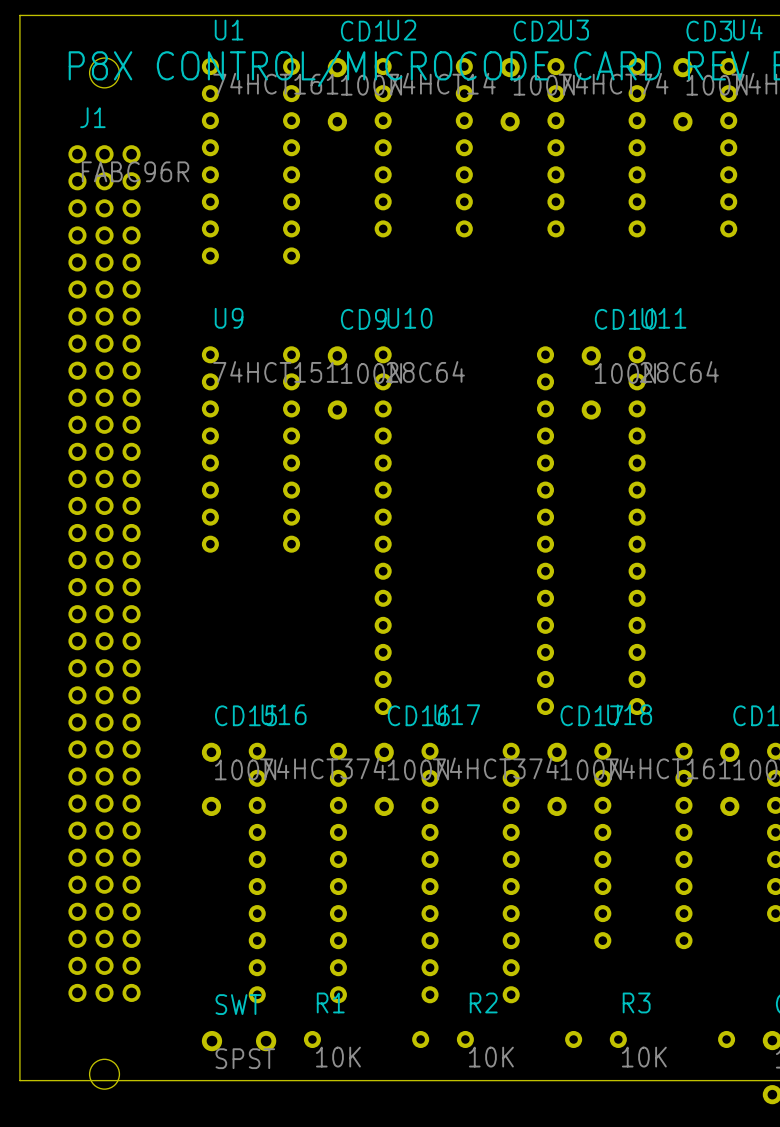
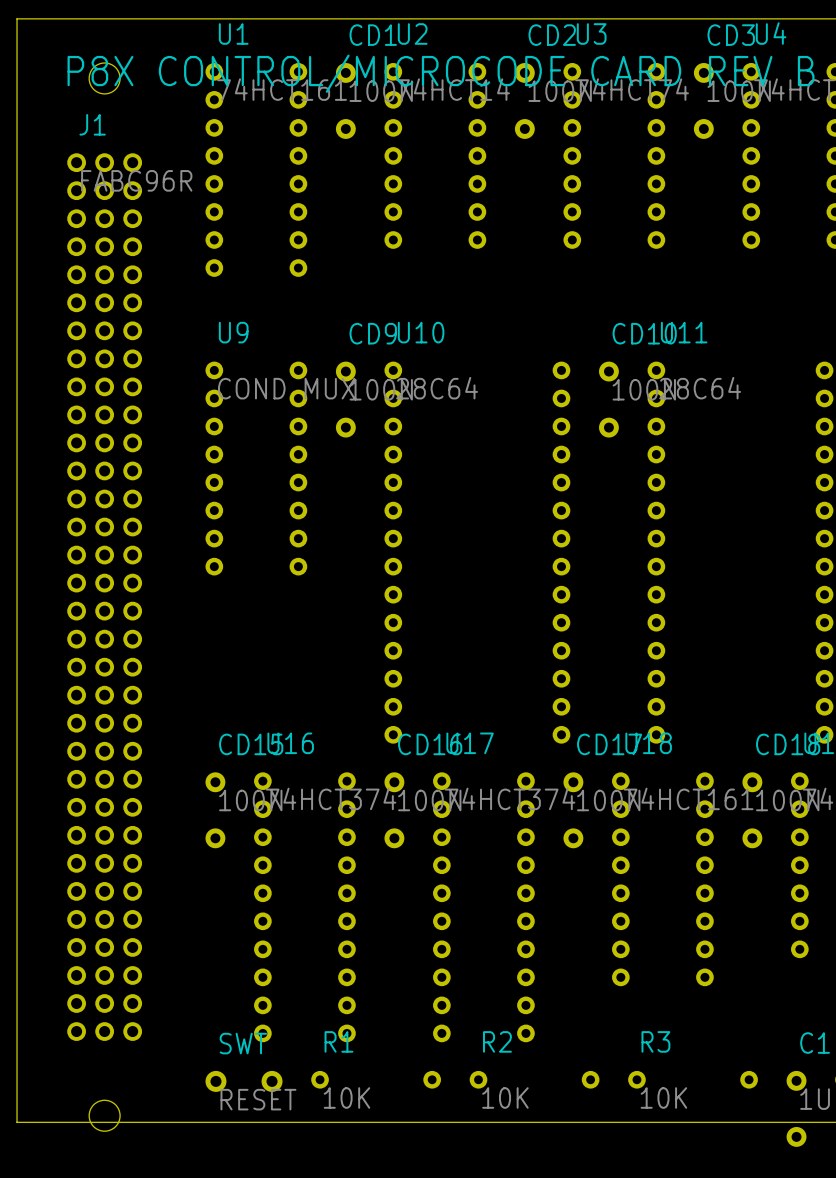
U9 value: 74HCT151 (275, 371) -> COND MUX (286, 388)
SWT value: SPST (245, 1058) -> RESET (258, 1099)

